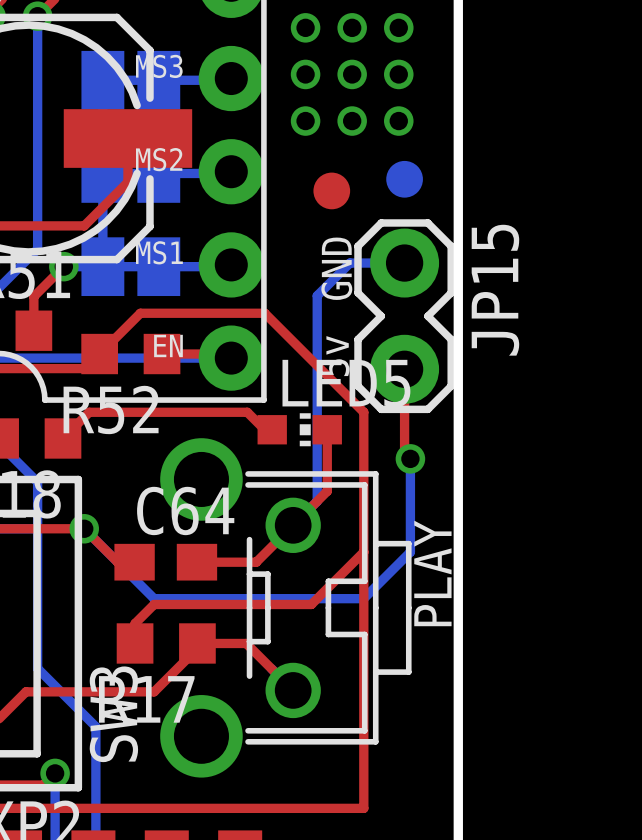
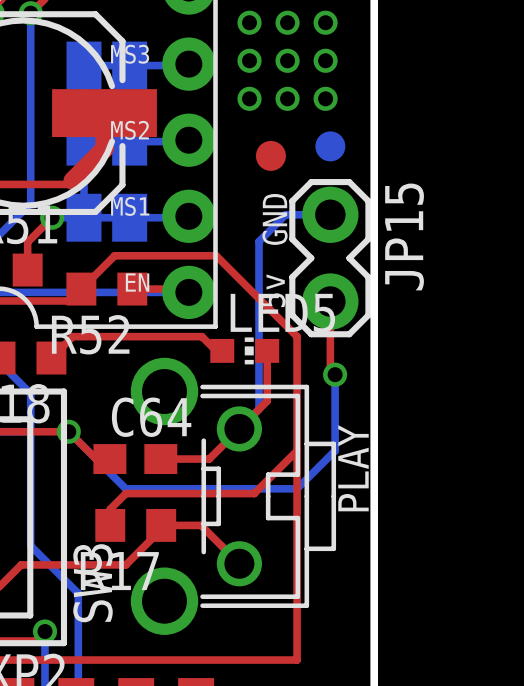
top track width: thin (127, 138) (127, 182) (88, 221) -> thick (104, 113) (104, 148) (72, 180)

